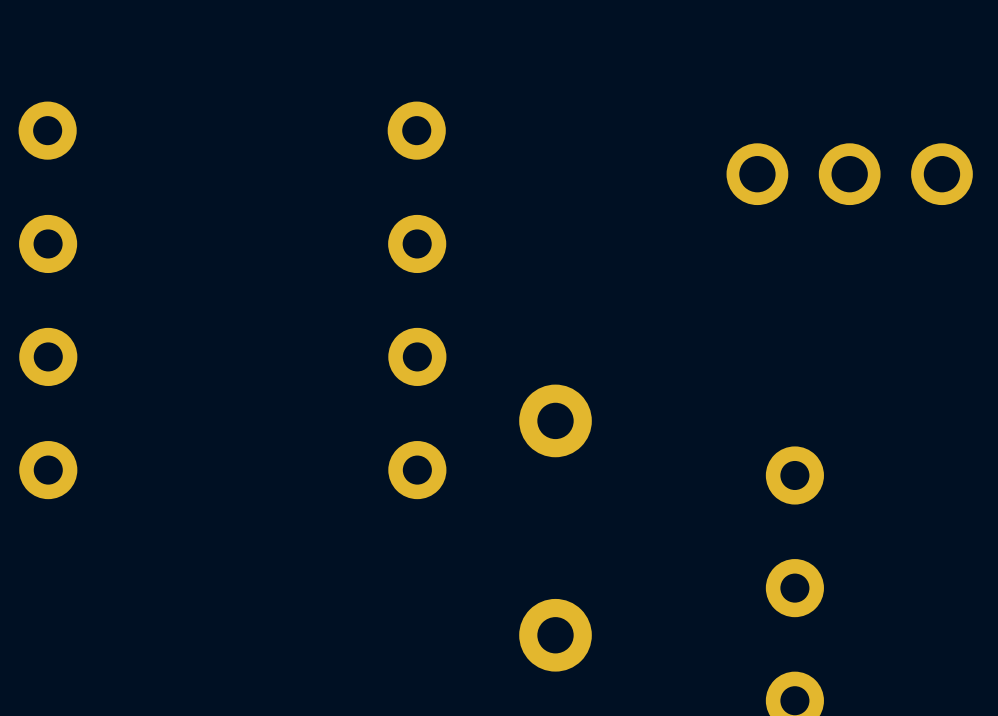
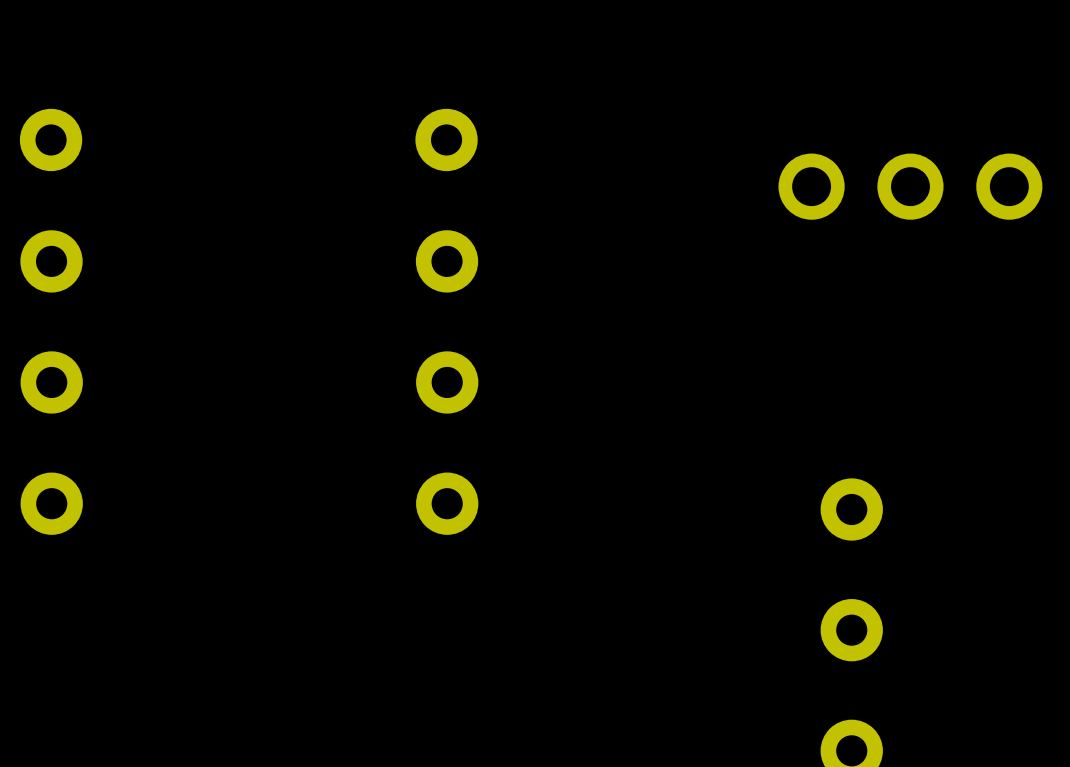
part: (555, 420) -> none
part: (555, 635) -> none

